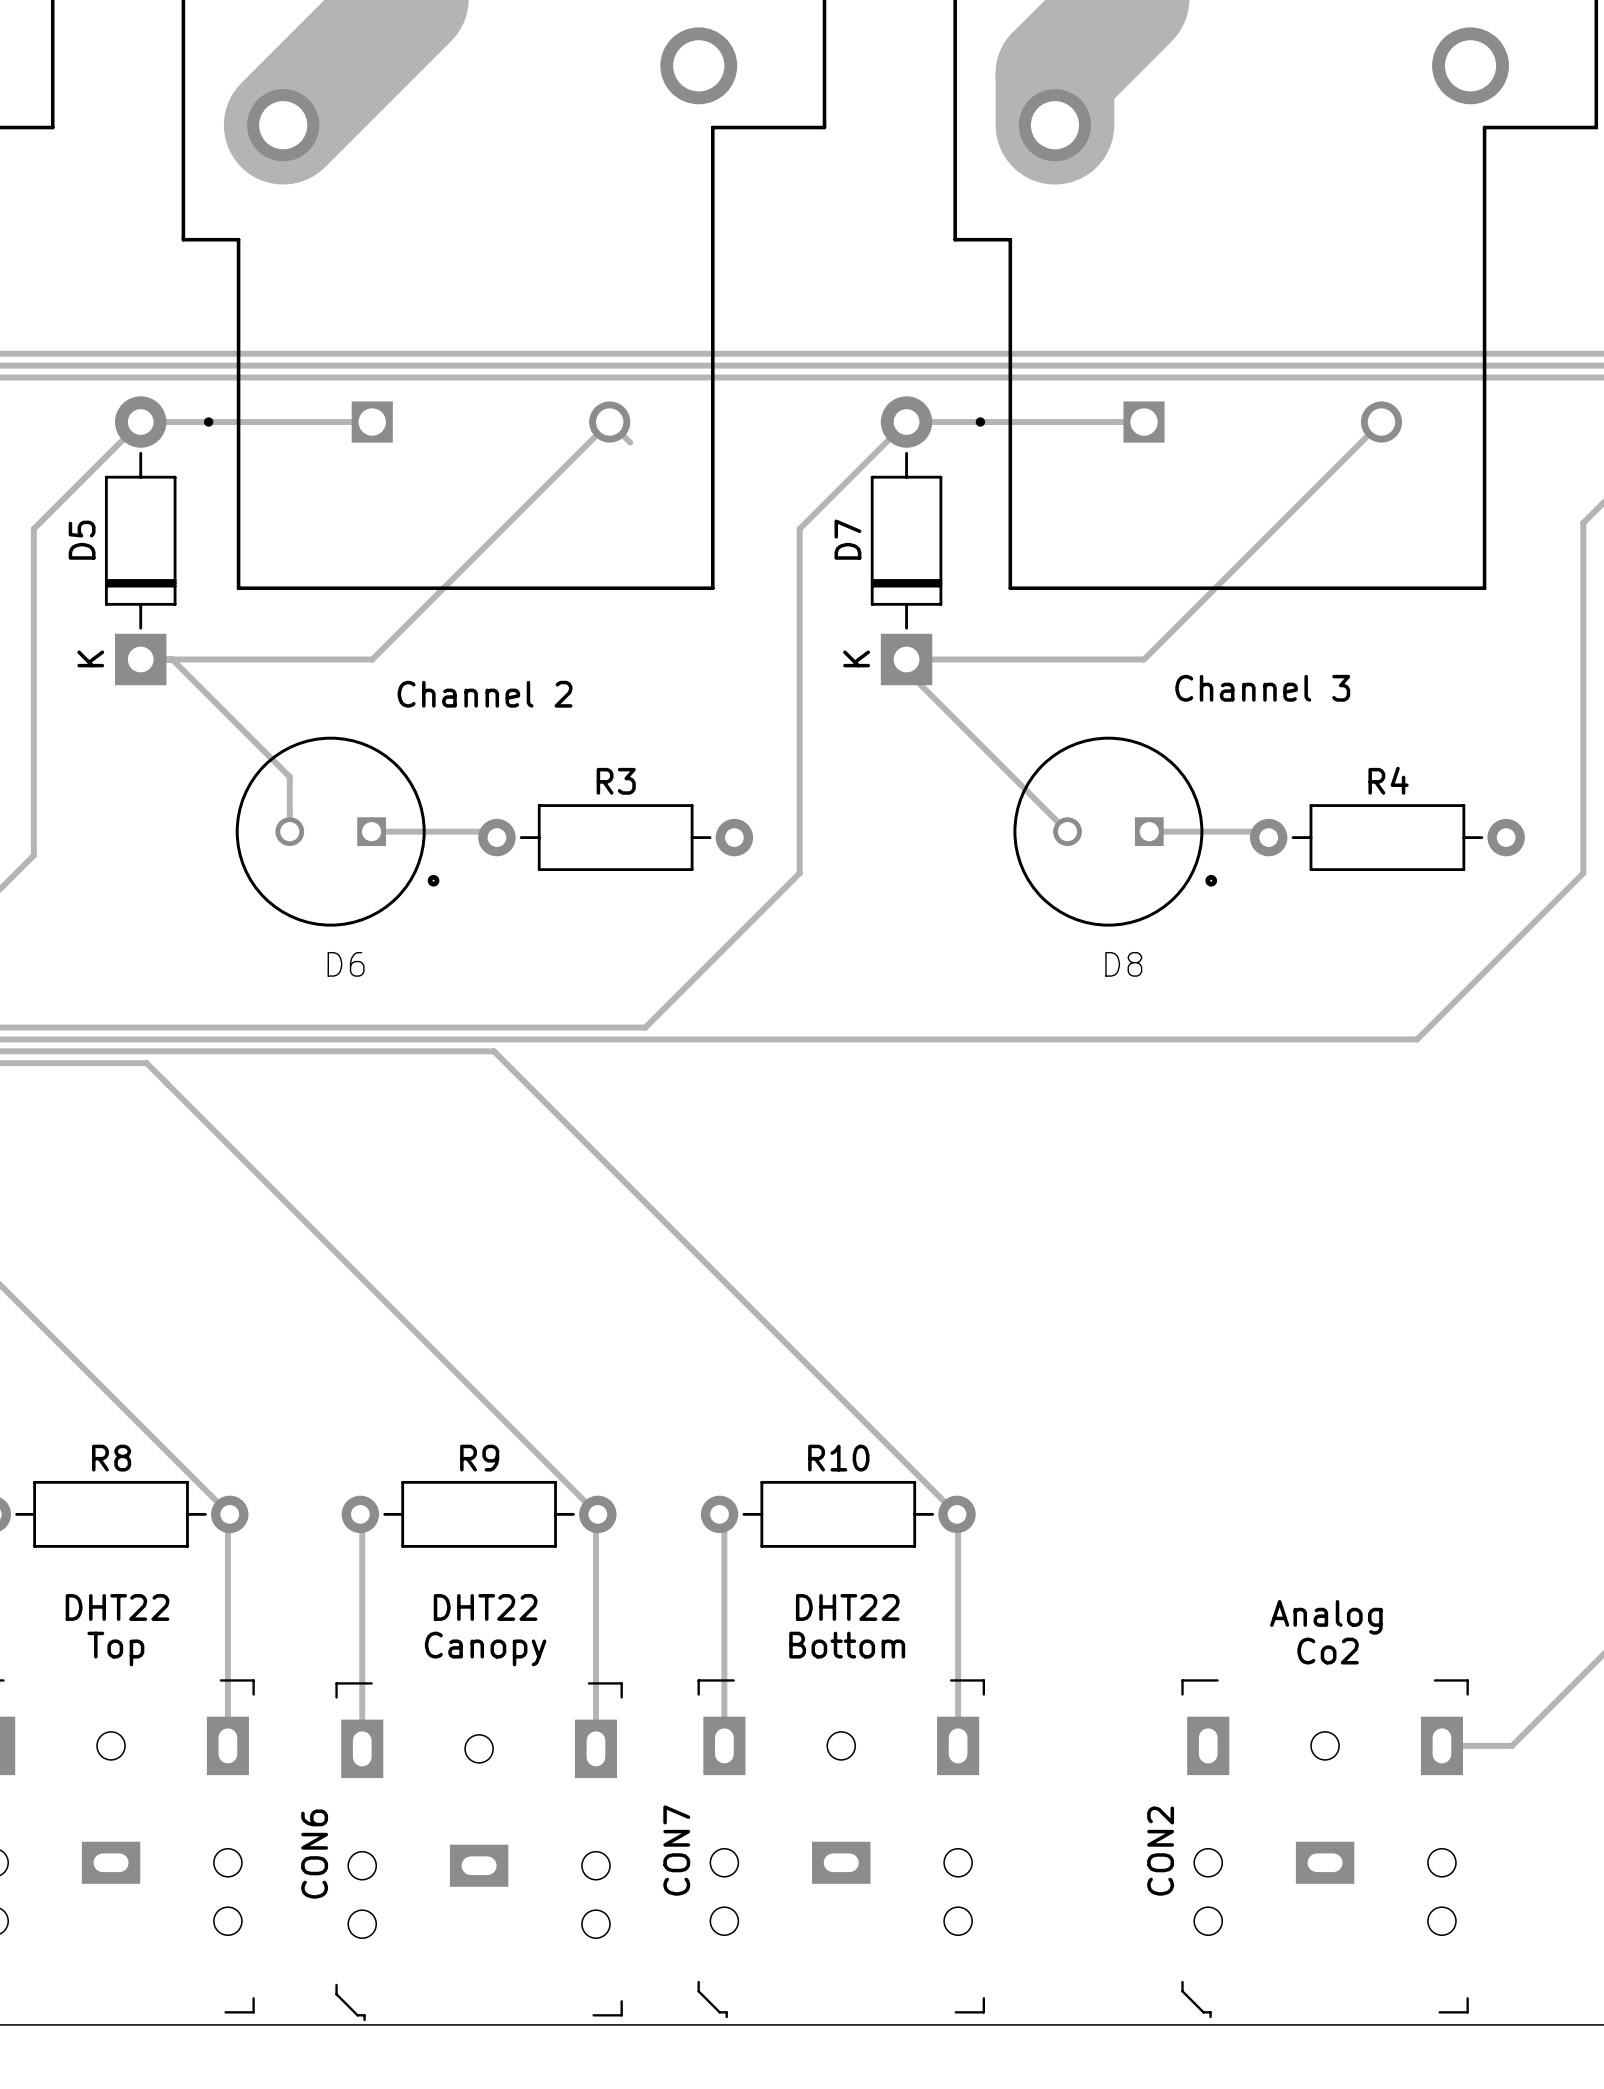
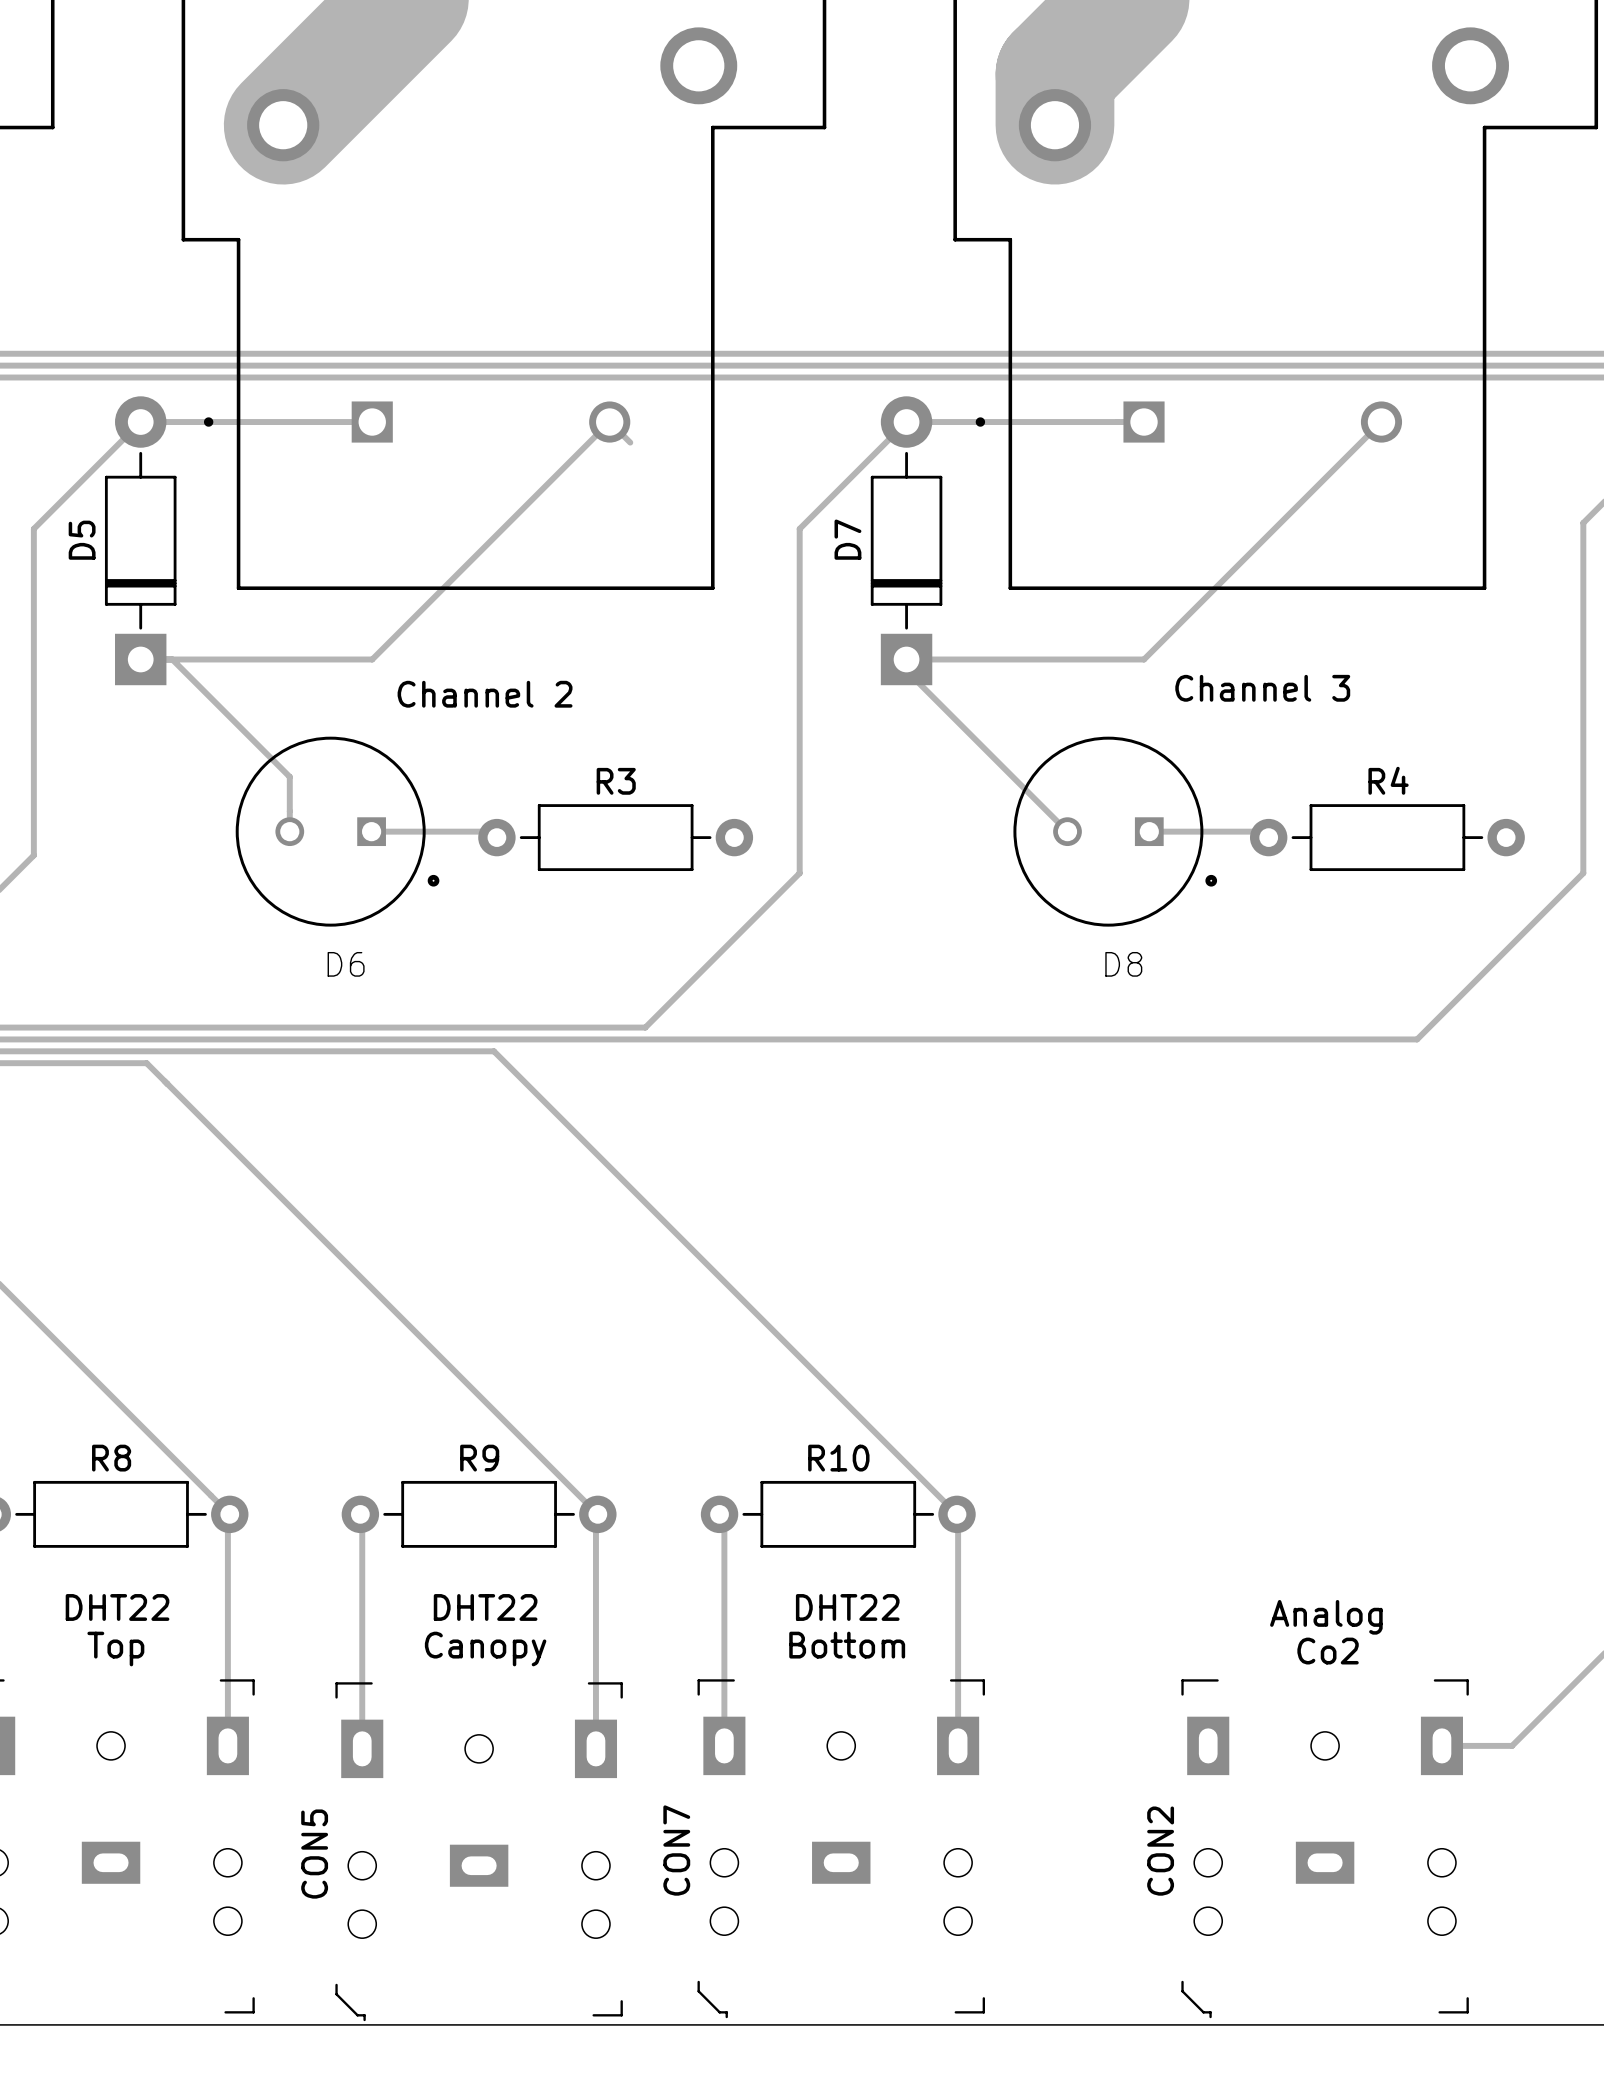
D5 text: K (90, 658) -> none
D7 text: K (856, 658) -> none
CON6 name: CON6 (314, 1854) -> CON5 (314, 1854)

